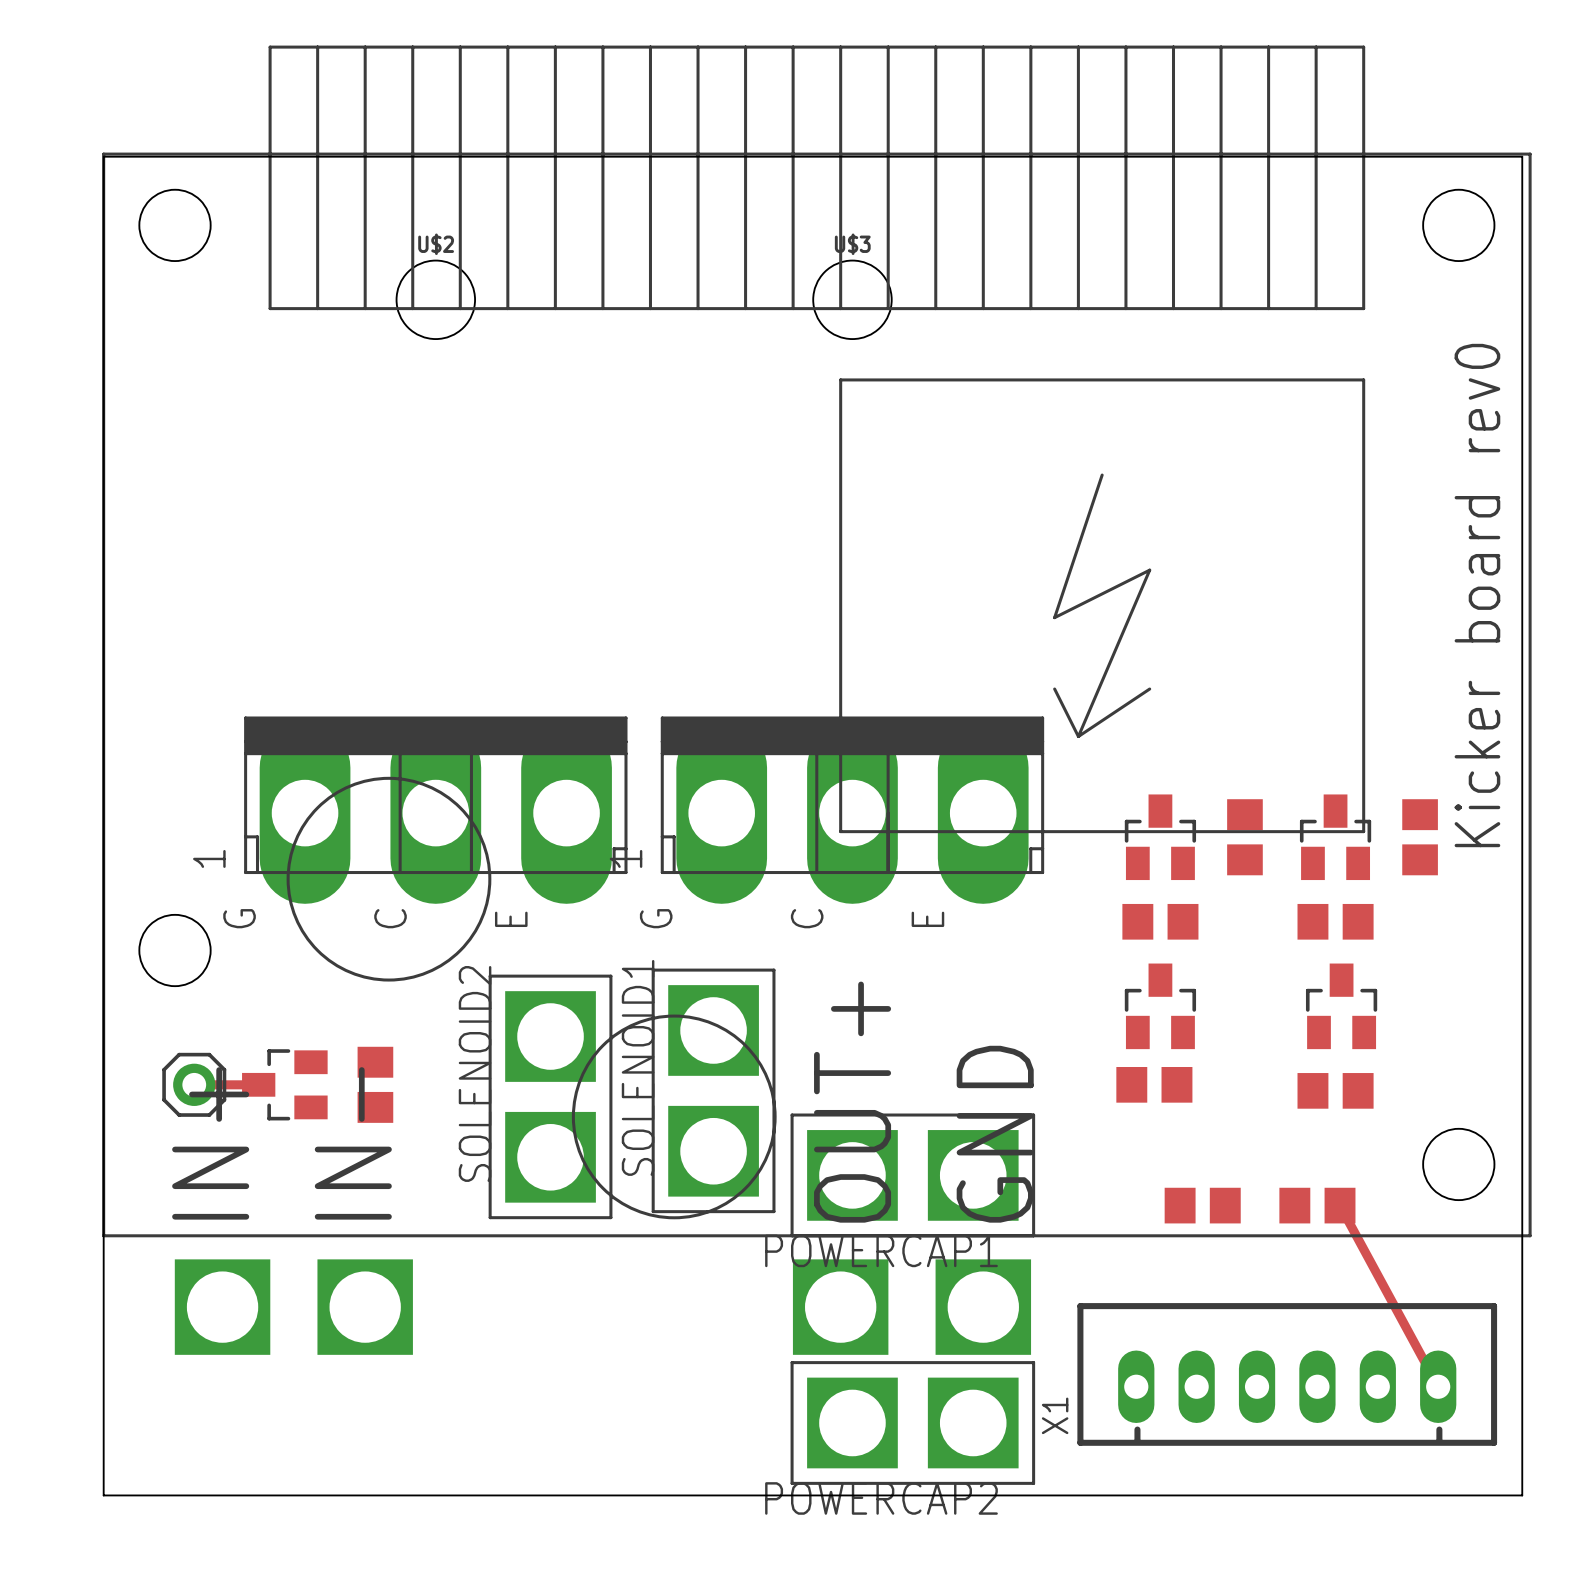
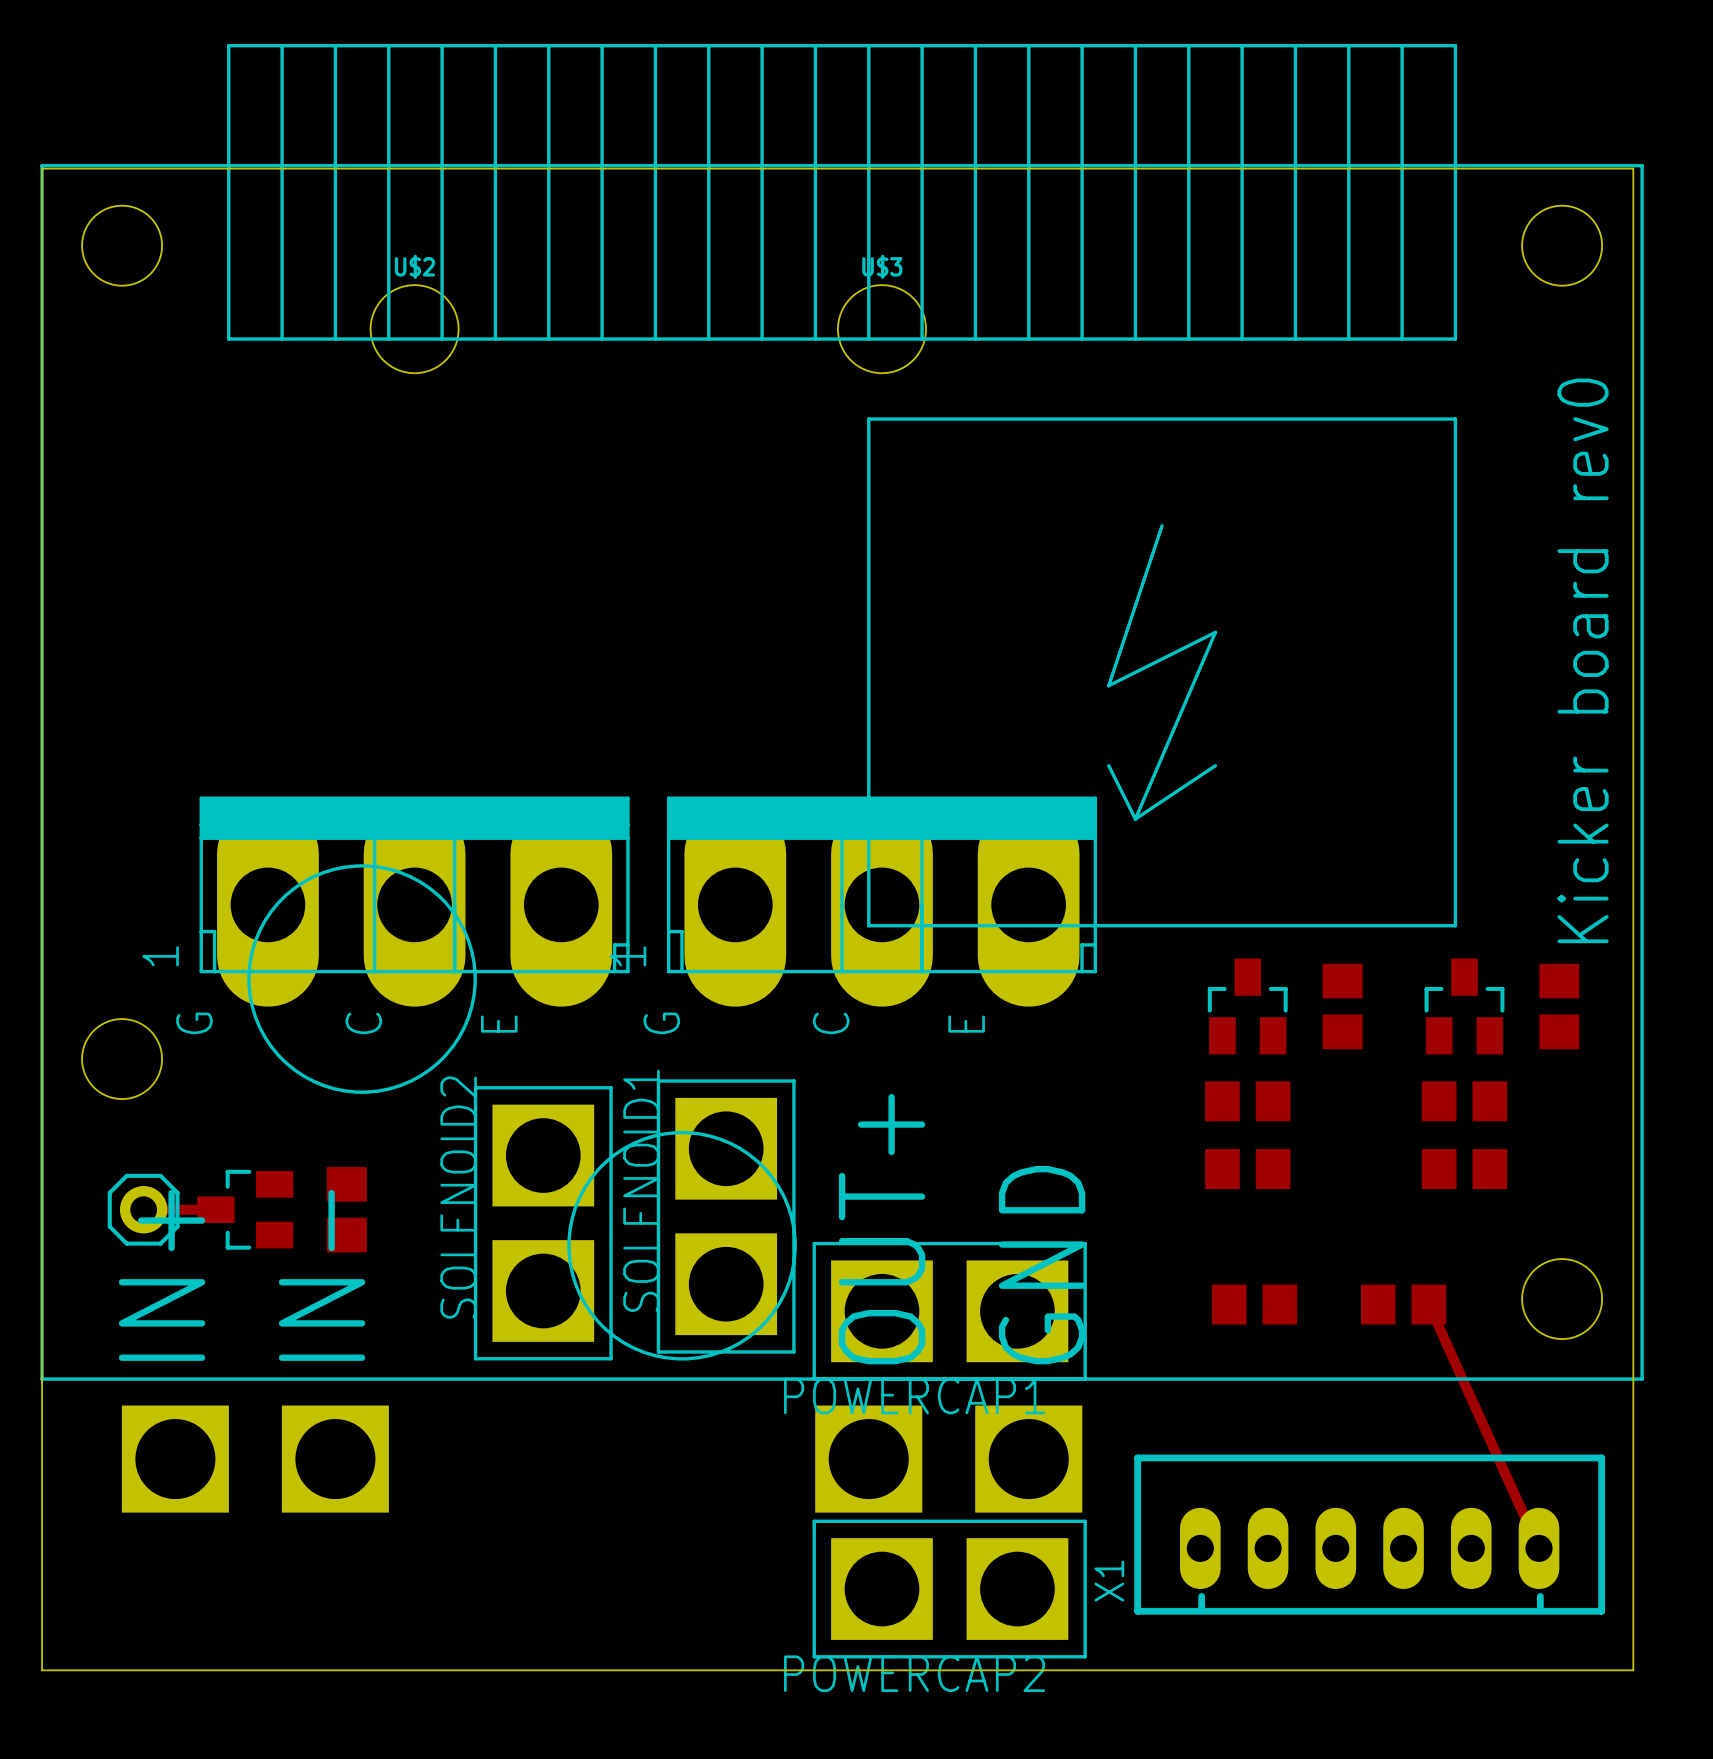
part: (1160, 837) -> none
part: (1244, 837) -> none
part: (1335, 837) -> none
part: (1420, 837) -> none
part: none -> (1247, 1006)
part: none -> (1342, 1006)
part: none -> (1464, 1006)
part: none -> (1559, 1006)
part: (1160, 921) -> none
part: (1335, 921) -> none
part: none -> (1247, 1101)
part: none -> (1464, 1101)
part: (1160, 1006) -> none
part: (1341, 1006) -> none
part: none -> (1464, 1169)
part position: (1154, 1084) -> (1247, 1169)
part: (1335, 1090) -> none
part position: (1202, 1205) -> (1254, 1304)
part position: (1317, 1205) -> (1403, 1304)
track: (1340, 1205) (1438, 1386) -> (1428, 1304) (1539, 1548)

